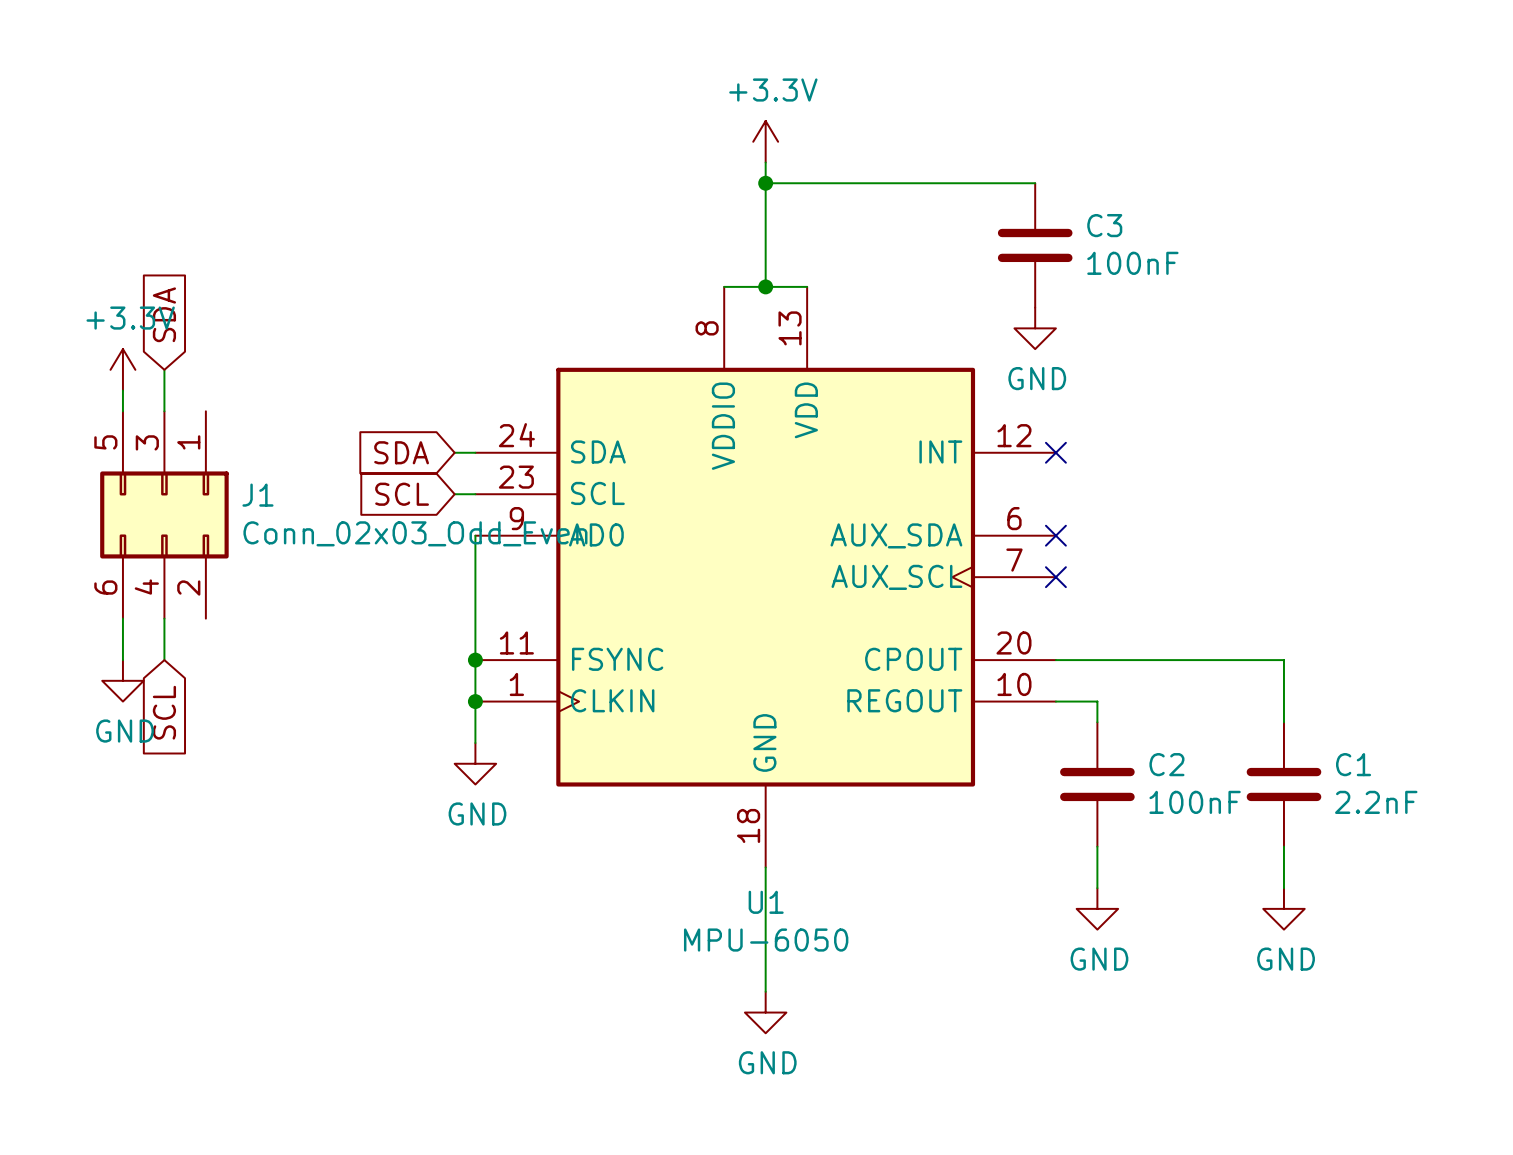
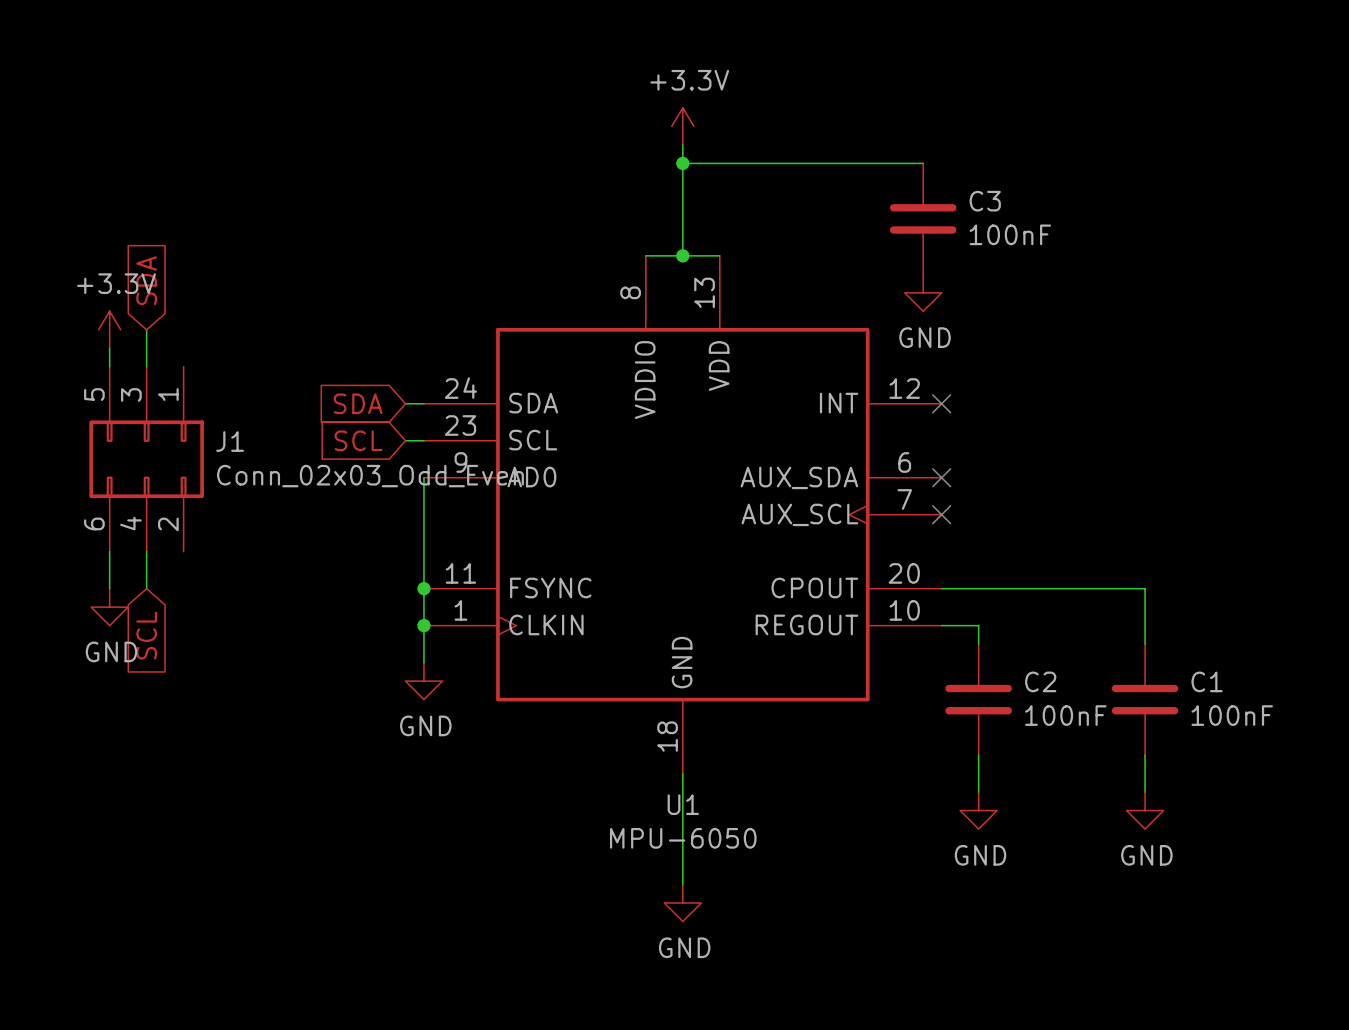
C1 value: 2.2nF (1376, 802) -> 100nF (1232, 715)

